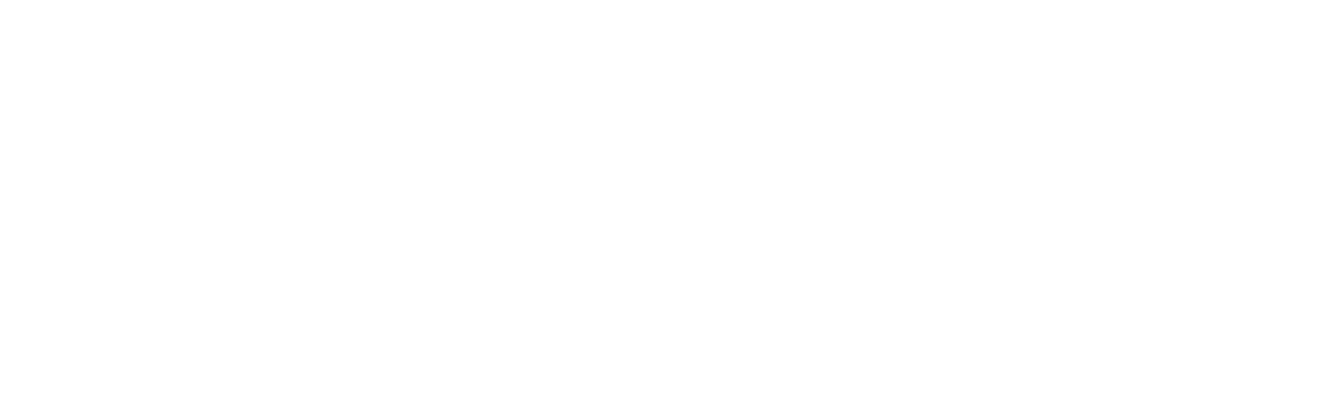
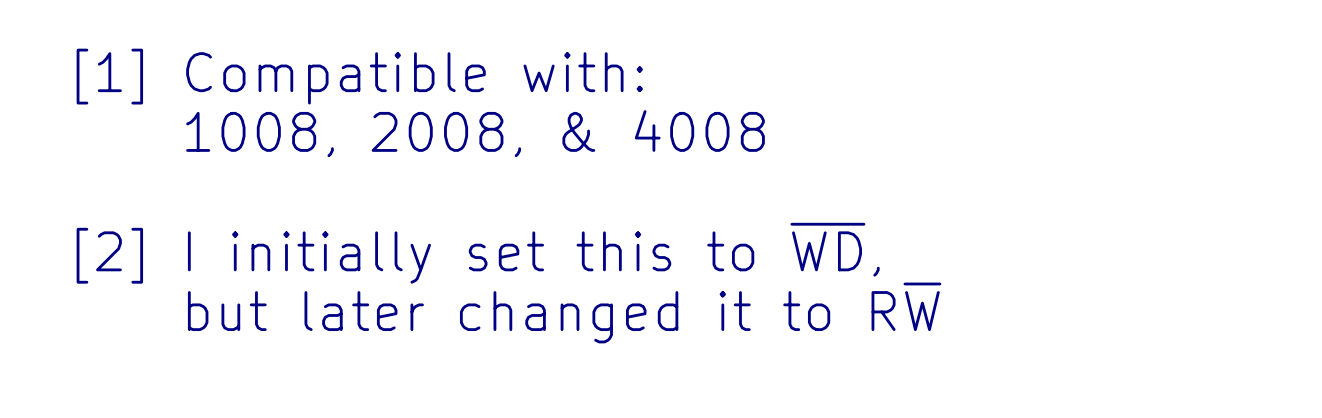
text: none -> [1] Compatible with: (359, 76)
text: none -> 1008, 2008, & 4008 (475, 133)
text: none -> [2] I initially set this to ~{WD}, (478, 253)
text: none -> but later changed it to R~{W} (564, 312)

